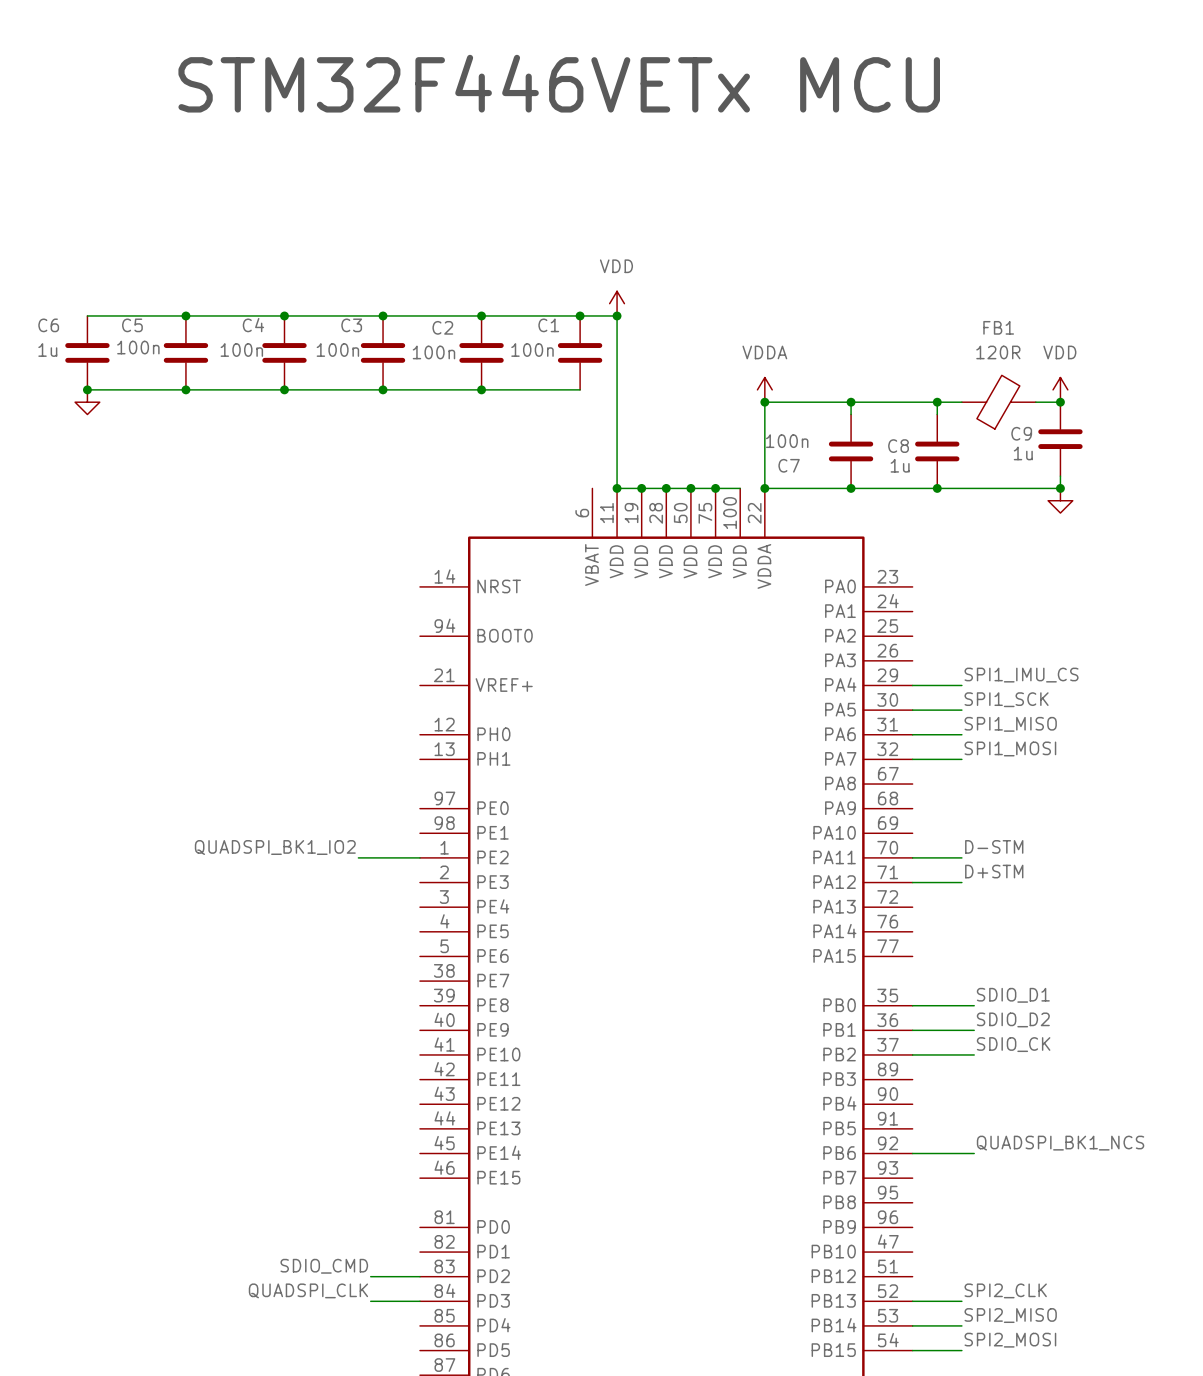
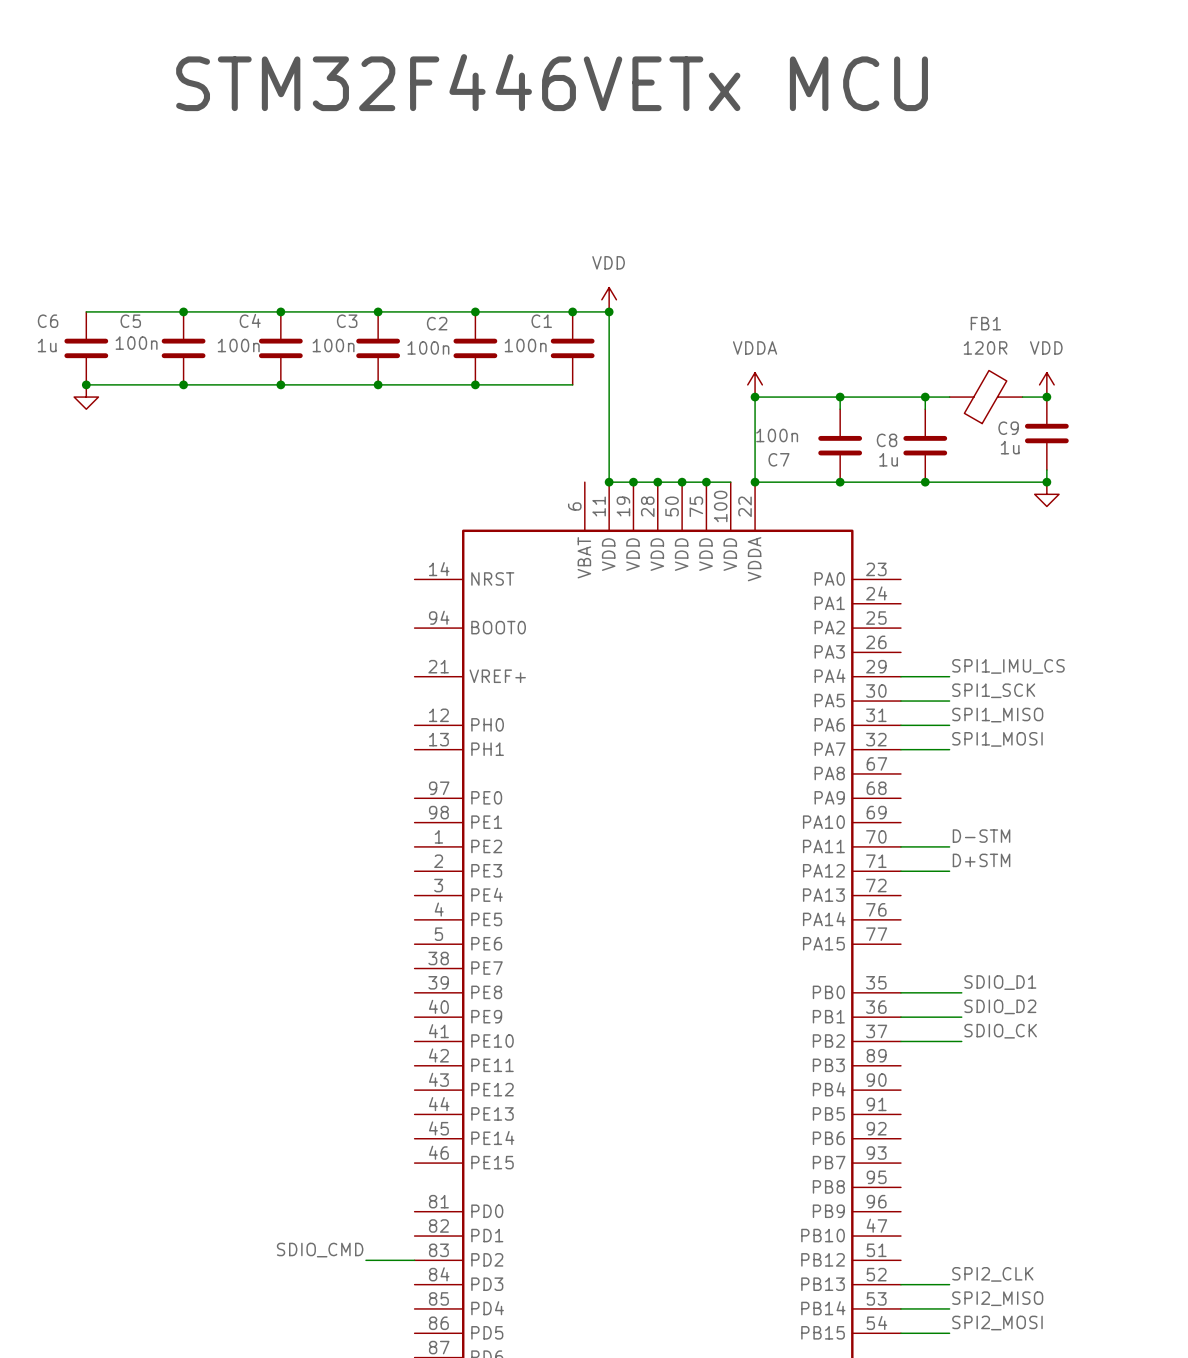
label: QUADSPI_BK1_IO2 (275, 847) -> none
wire: (358, 857) (419, 857) -> none
label: QUADSPI_BK1_NCS (1060, 1143) -> none
wire: (912, 1153) (974, 1153) -> none
label: QUADSPI_CLK (308, 1290) -> none
wire: (370, 1301) (419, 1301) -> none

